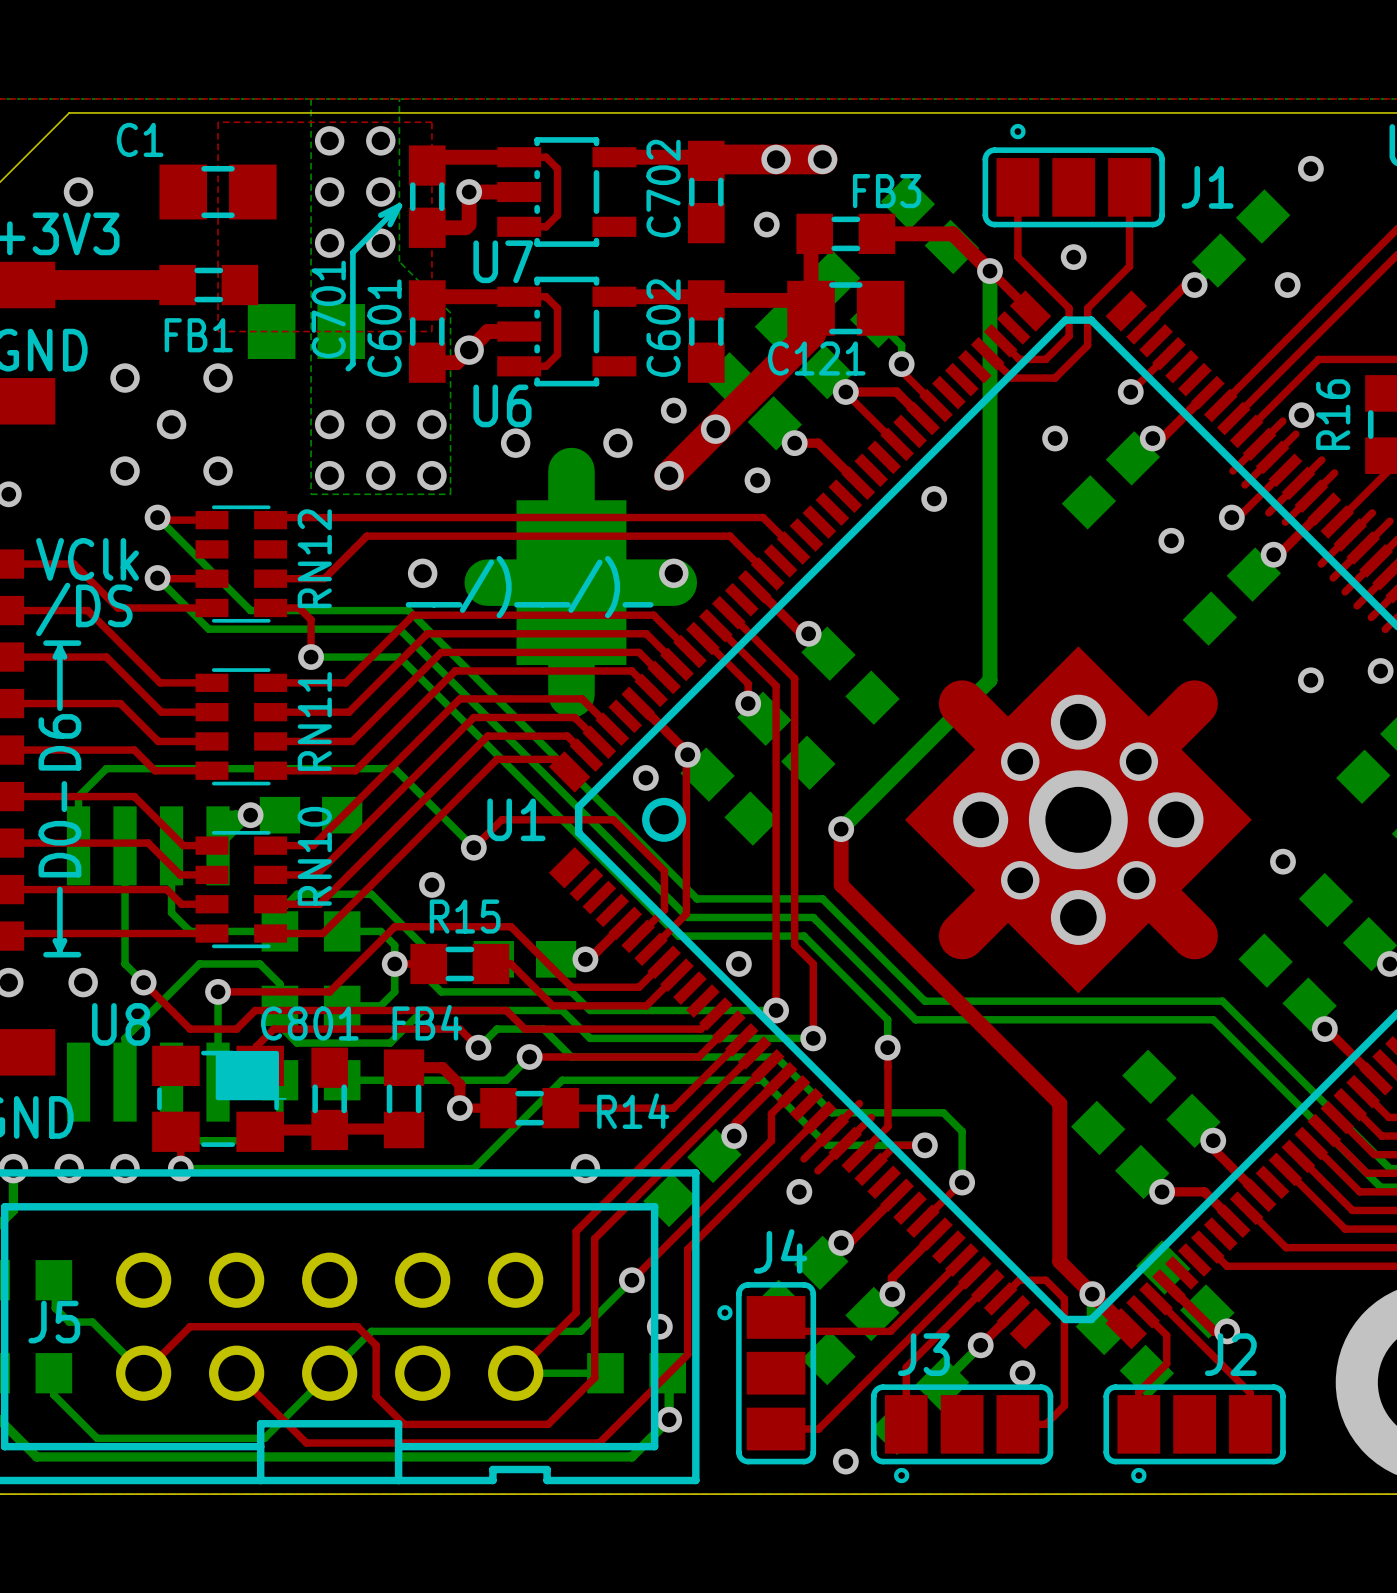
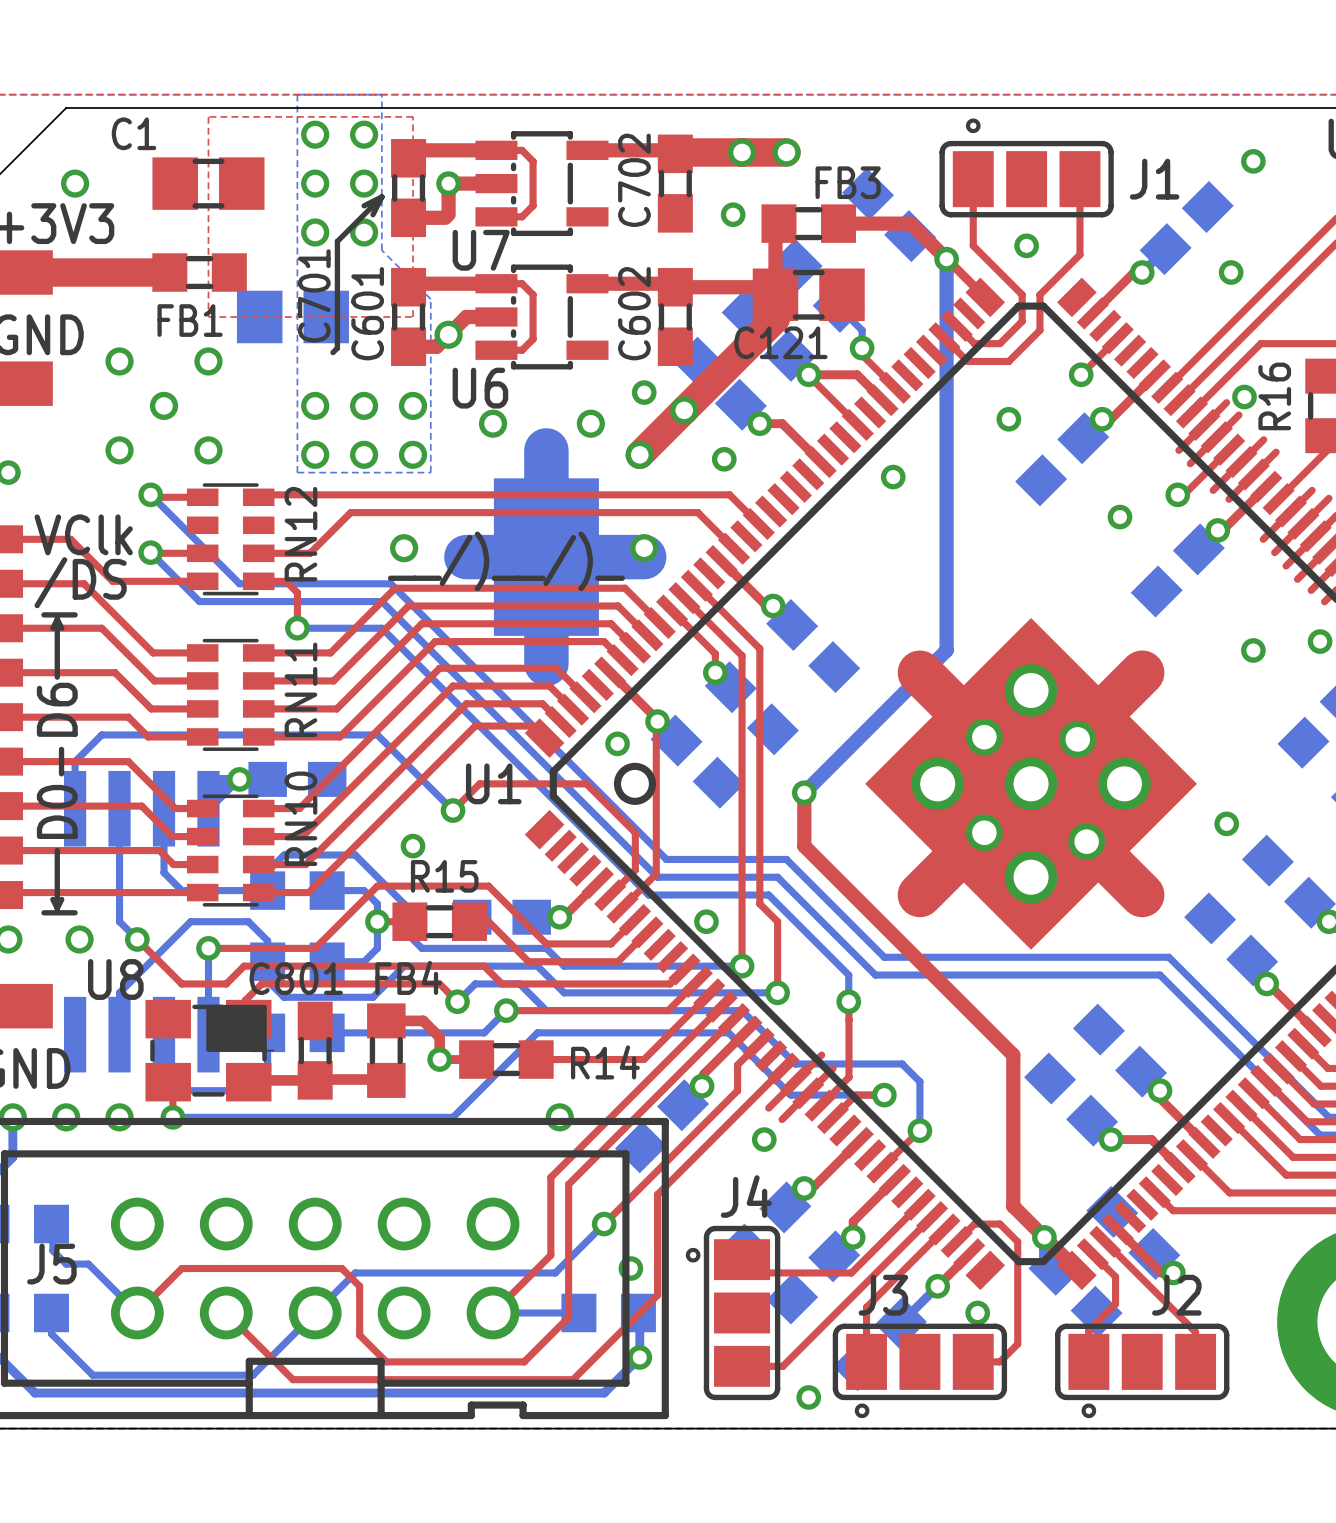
via position: (1020, 761) -> (984, 737)
via position: (1138, 761) -> (1077, 739)
via size: [1028, 770, 1128, 870] -> [1004, 757, 1058, 811]
via position: (1020, 880) -> (984, 832)

